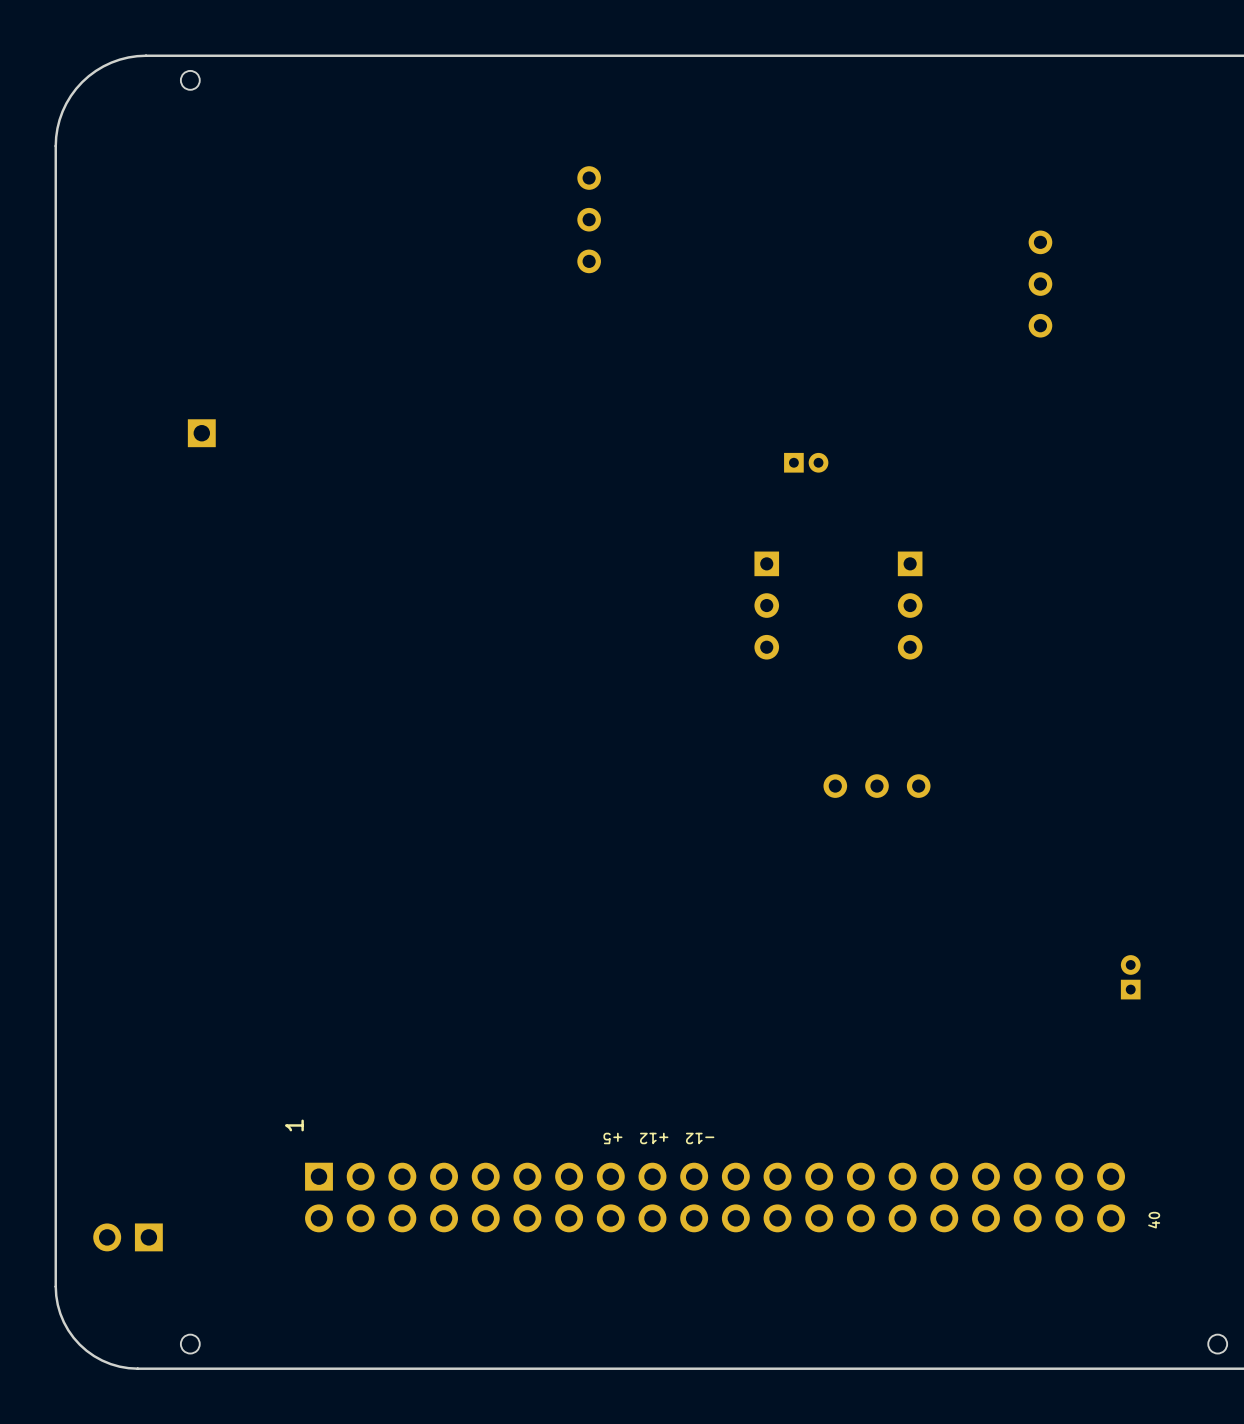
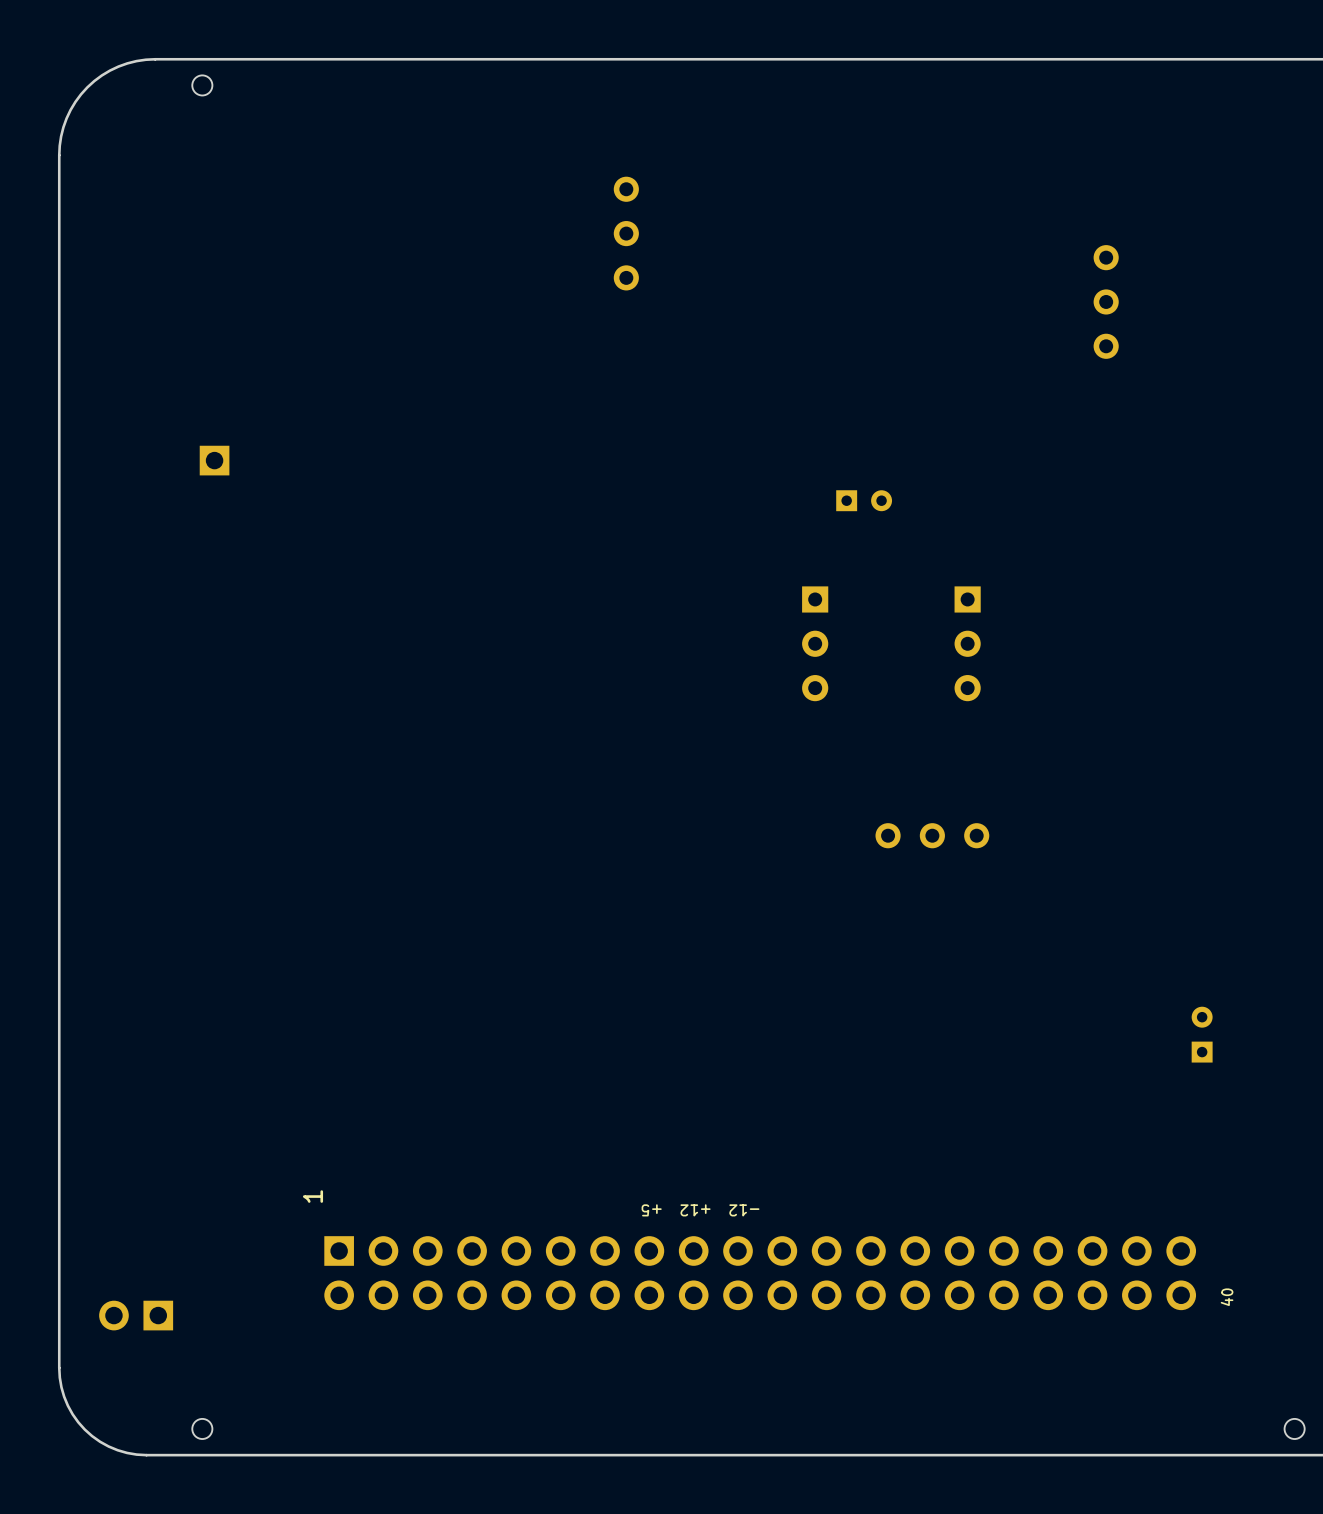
part footprint: [784, 452, 829, 473] -> [836, 490, 893, 512]
part footprint: [1120, 955, 1141, 1000] -> [1191, 1006, 1213, 1063]

